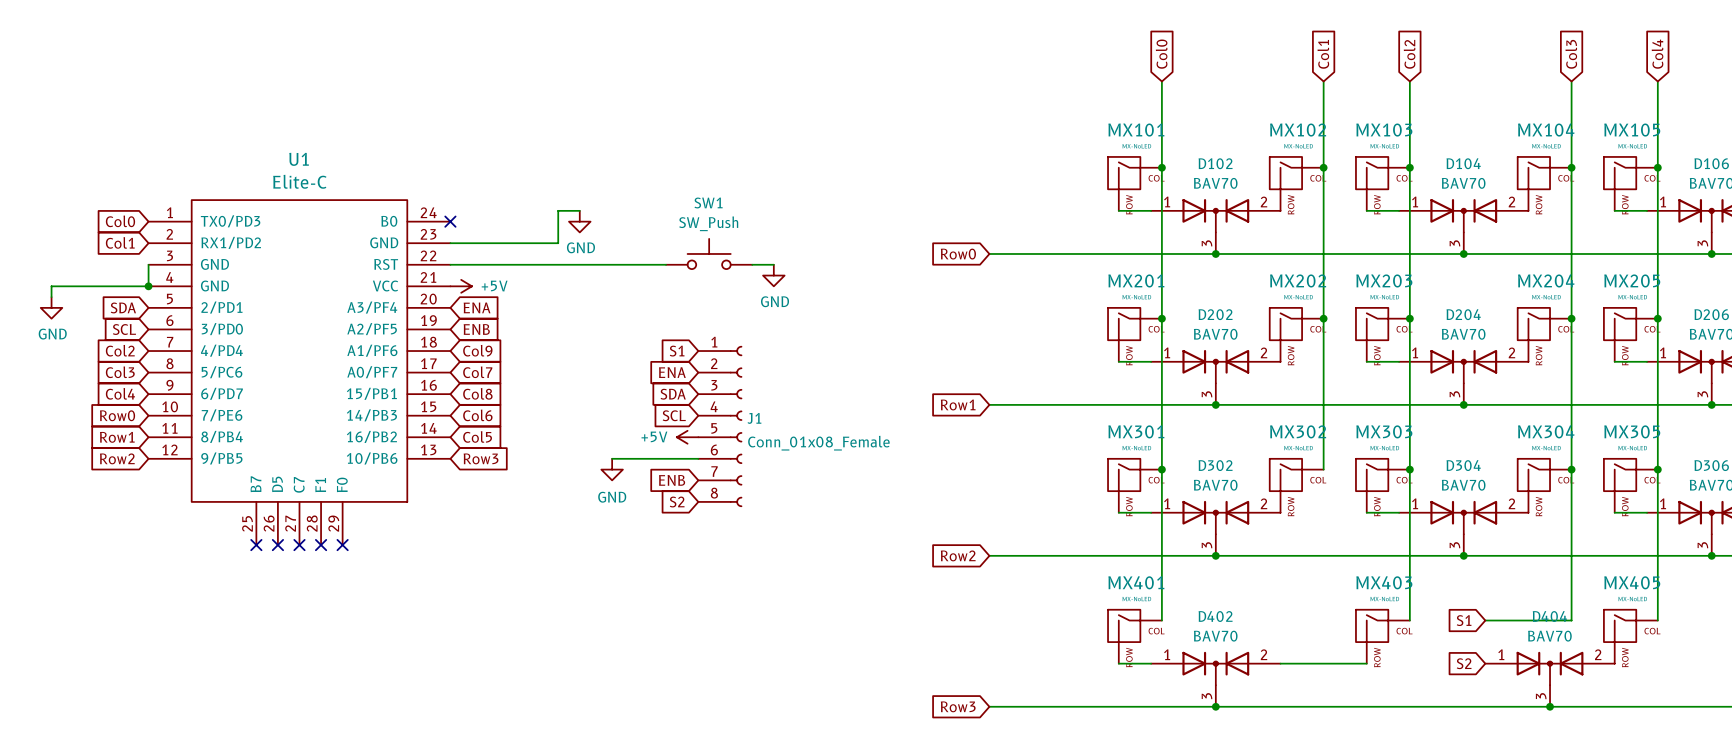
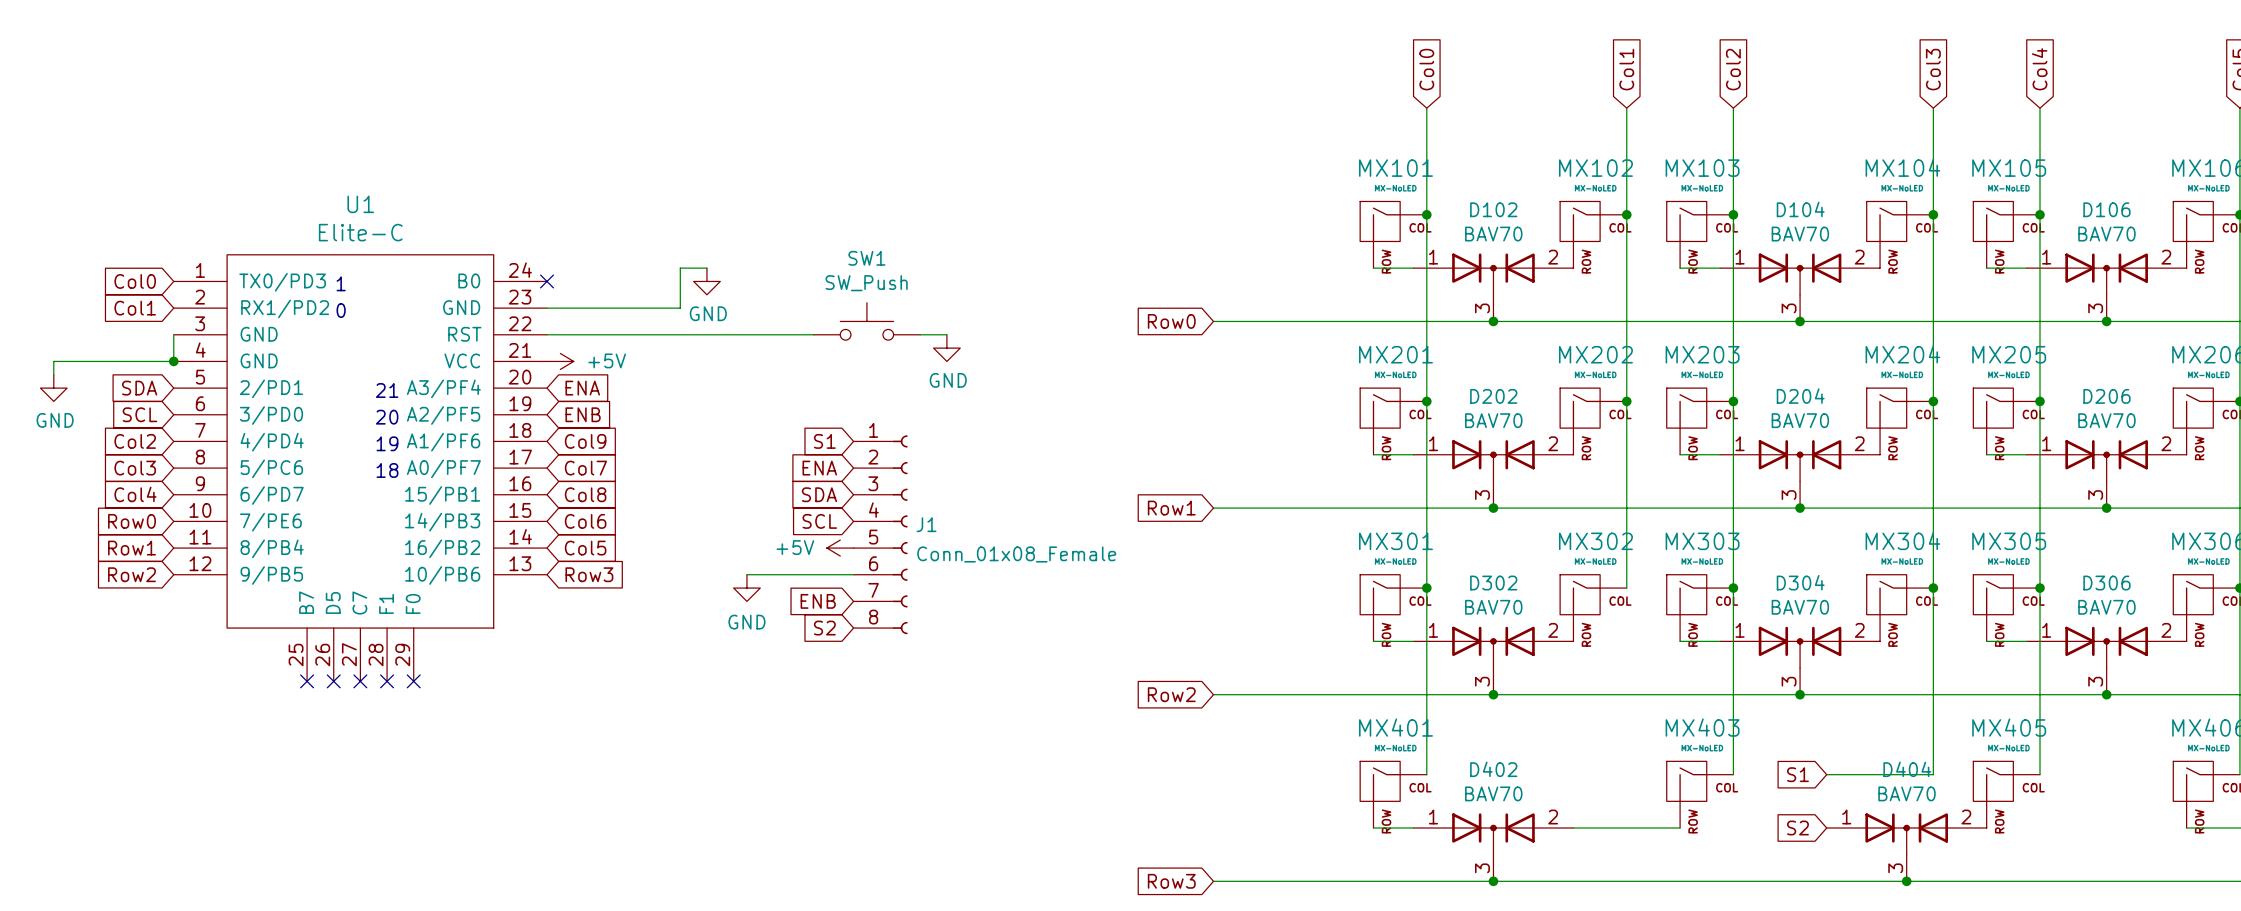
text: none -> 1 (341, 283)
text: none -> 0 (341, 310)
text: none -> 21 (387, 390)
text: none -> 20 (387, 417)
text: none -> 19 (387, 443)
text: none -> 18 (387, 470)

